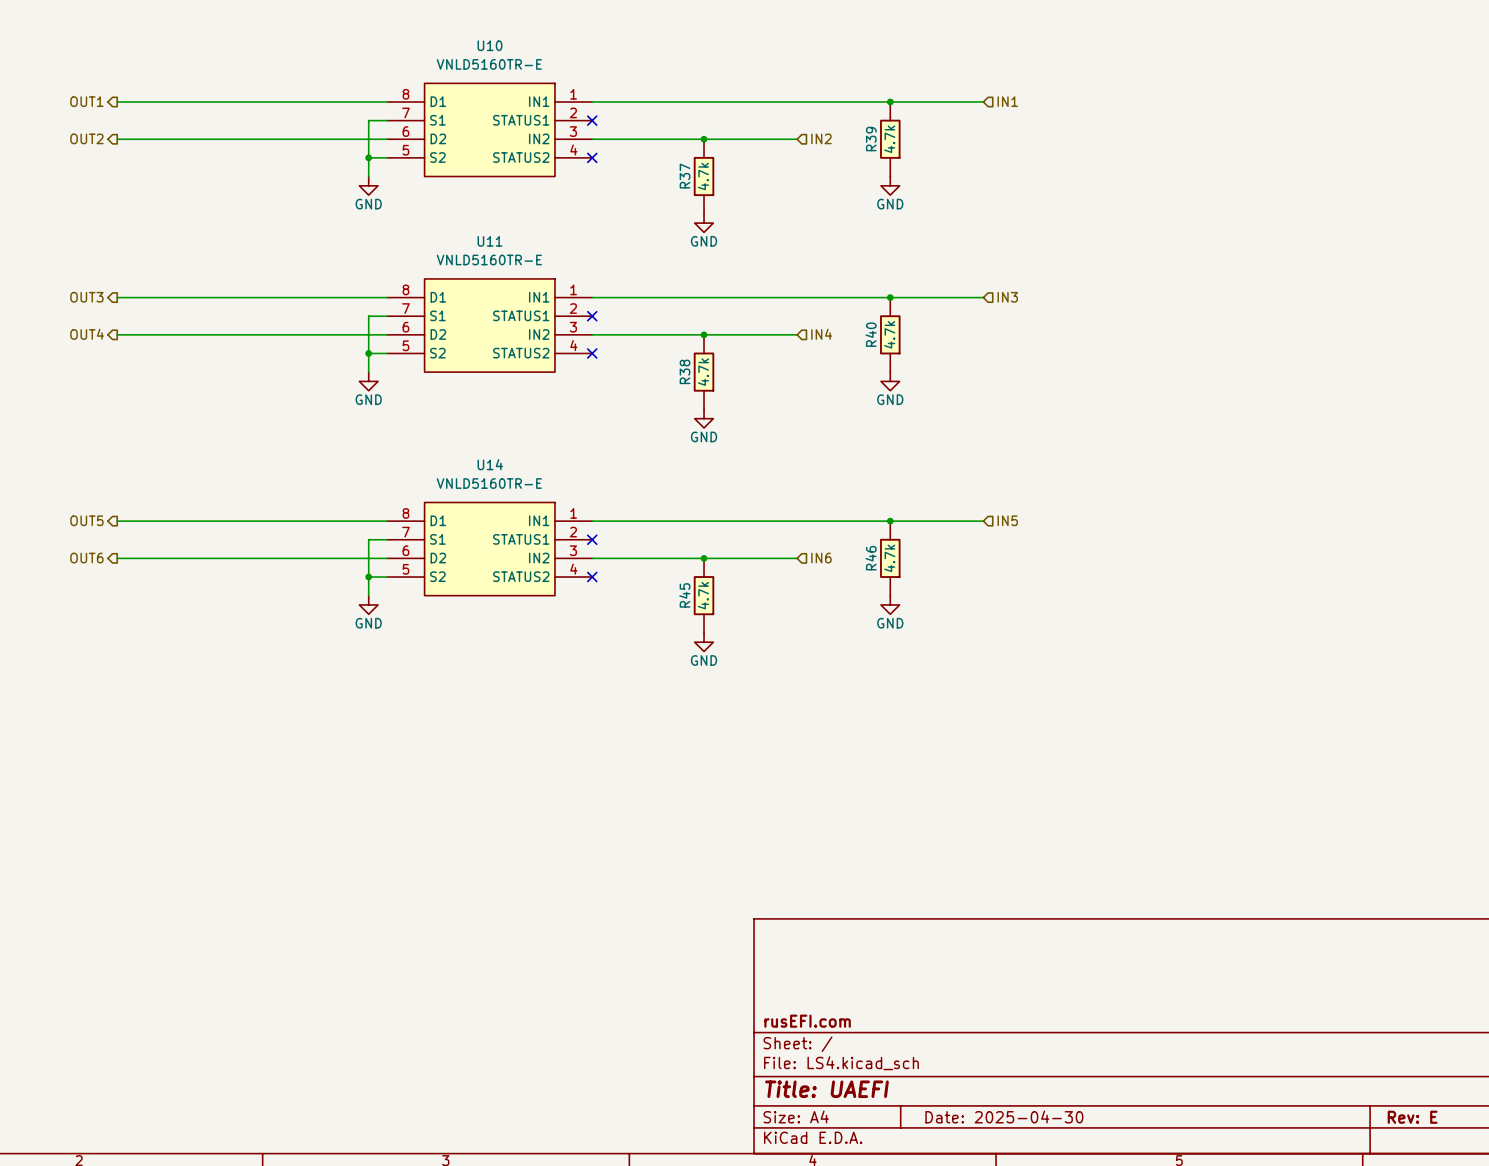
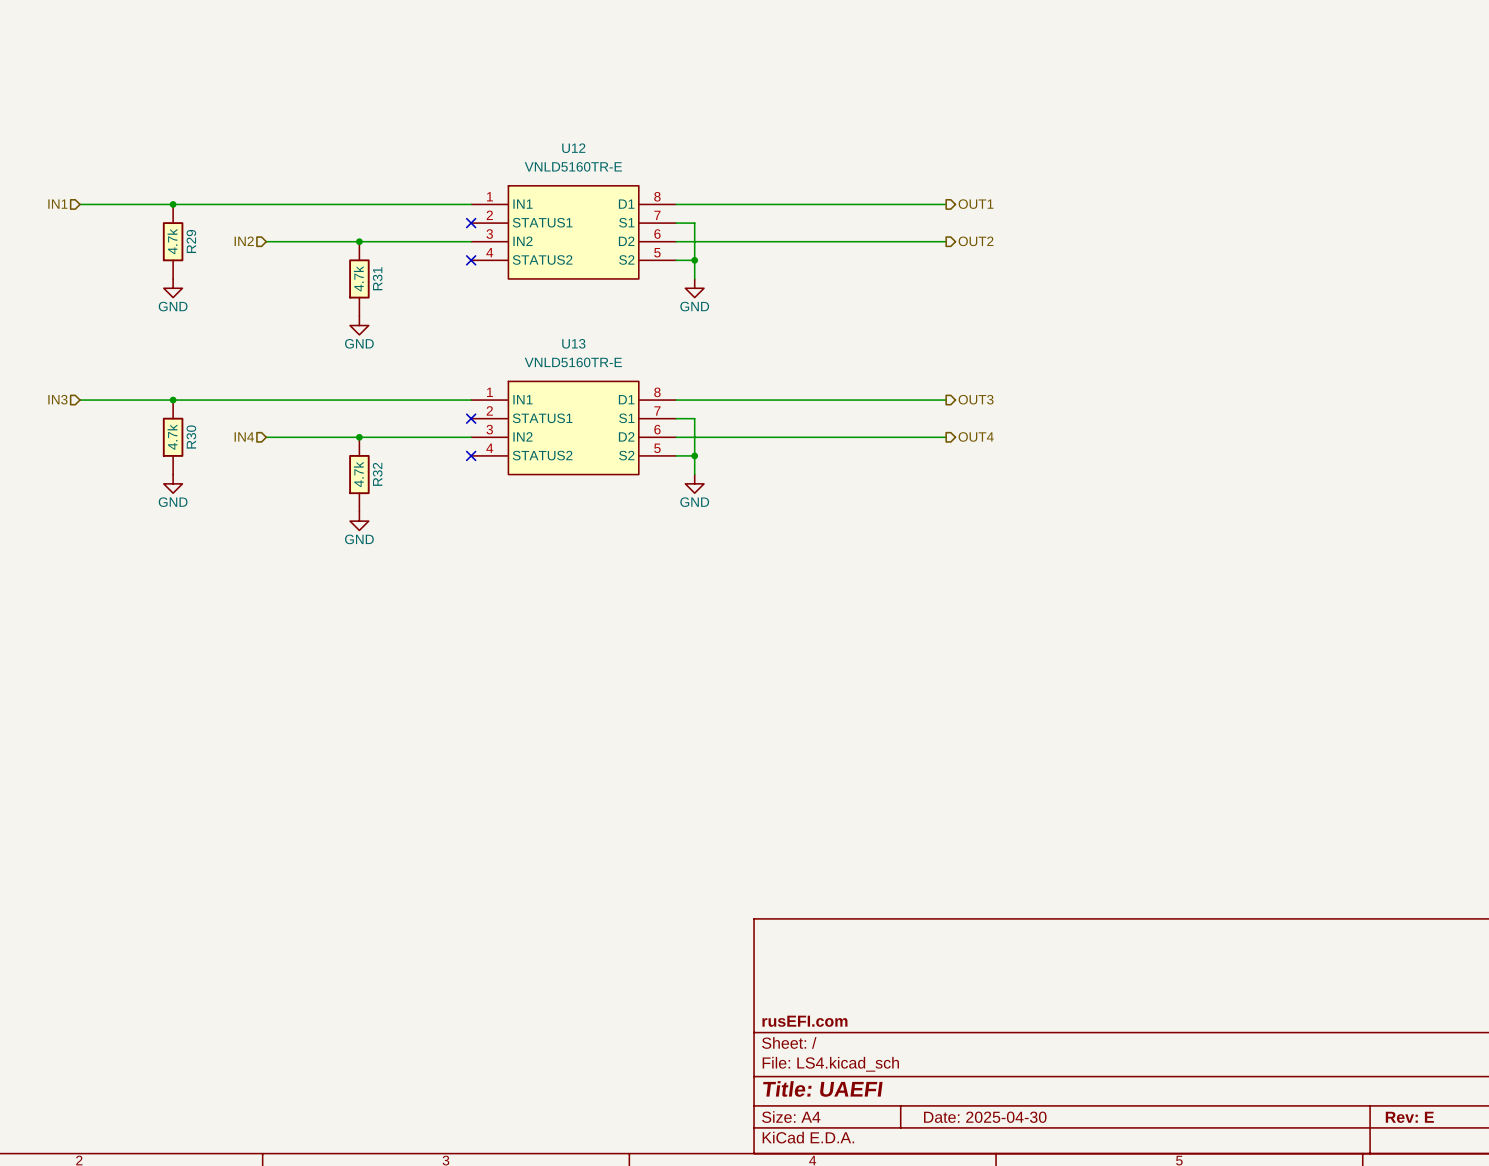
hierarchical label: OUT1 (86, 101) -> none
hierarchical label: IN1 (1007, 101) -> none
wire: (117, 102) (387, 102) -> none
wire: (592, 102) (983, 102) -> none
junction: (890, 102) -> none
wire: (387, 120) (368, 120) (368, 176) -> none
no-connect mark: (592, 120) -> none
U10: VNLD5160TR-E (489, 129) -> none
hierarchical label: OUT2 (86, 138) -> none
hierarchical label: IN2 (821, 138) -> none
wire: (117, 139) (387, 139) -> none
wire: (592, 139) (797, 139) -> none
junction: (704, 139) -> none
R39: 4.7k (890, 139) -> none
wire: (368, 157) (387, 157) -> none
junction: (368, 157) -> none
no-connect mark: (592, 157) -> none
R37: 4.7k (704, 176) -> none
power symbol: GND (368, 185) -> none
power symbol: GND (890, 185) -> none
hierarchical label: none -> IN1 (57, 204)
wire: none -> (79, 204) (471, 204)
junction: none -> (173, 204)
wire: none -> (676, 204) (946, 204)
hierarchical label: none -> OUT1 (976, 204)
no-connect mark: none -> (471, 223)
wire: none -> (676, 223) (694, 223) (694, 278)
power symbol: GND (704, 223) -> none
U12: none -> VNLD5160TR-E (573, 232)
R29: none -> 4.7k (173, 241)
hierarchical label: none -> IN2 (244, 241)
wire: none -> (266, 241) (471, 241)
junction: none -> (359, 241)
wire: none -> (676, 241) (946, 241)
hierarchical label: none -> OUT2 (976, 241)
no-connect mark: none -> (471, 260)
wire: none -> (676, 260) (694, 260)
junction: none -> (694, 260)
R31: none -> 4.7k (359, 278)
power symbol: none -> GND (173, 288)
power symbol: none -> GND (694, 288)
hierarchical label: OUT3 (86, 297) -> none
wire: (117, 297) (387, 297) -> none
wire: (592, 297) (983, 297) -> none
junction: (890, 297) -> none
hierarchical label: IN3 (1007, 297) -> none
wire: (387, 316) (368, 316) (368, 372) -> none
no-connect mark: (592, 316) -> none
U11: VNLD5160TR-E (489, 325) -> none
hierarchical label: OUT4 (87, 334) -> none
wire: (117, 334) (387, 334) -> none
wire: (592, 334) (797, 334) -> none
junction: (704, 334) -> none
hierarchical label: IN4 (821, 334) -> none
R40: 4.7k (890, 334) -> none
wire: (368, 353) (387, 353) -> none
junction: (368, 353) -> none
no-connect mark: (592, 353) -> none
R38: 4.7k (704, 372) -> none
power symbol position: GND (368, 381) -> GND (359, 325)
power symbol: GND (890, 381) -> none
hierarchical label: none -> IN3 (57, 399)
hierarchical label: none -> OUT3 (976, 399)
wire: none -> (79, 400) (471, 400)
junction: none -> (173, 400)
wire: none -> (676, 400) (946, 400)
no-connect mark: none -> (471, 418)
wire: none -> (676, 418) (694, 418) (694, 474)
power symbol: GND (704, 418) -> none
U13: none -> VNLD5160TR-E (573, 427)
hierarchical label: none -> IN4 (244, 436)
hierarchical label: none -> OUT4 (976, 436)
R30: none -> 4.7k (173, 437)
wire: none -> (266, 437) (471, 437)
junction: none -> (359, 437)
wire: none -> (676, 437) (946, 437)
no-connect mark: none -> (471, 455)
wire: none -> (676, 455) (694, 455)
junction: none -> (694, 455)
R32: none -> 4.7k (359, 474)
power symbol: none -> GND (173, 483)
power symbol: none -> GND (694, 483)
hierarchical label: OUT5 (86, 520) -> none
hierarchical label: IN5 (1007, 520) -> none
wire: (117, 521) (387, 521) -> none
power symbol: none -> GND (359, 521)
wire: (592, 521) (983, 521) -> none
junction: (890, 521) -> none
wire: (387, 539) (368, 539) (368, 595) -> none
no-connect mark: (592, 539) -> none
U14: VNLD5160TR-E (489, 549) -> none
hierarchical label: OUT6 (86, 558) -> none
wire: (117, 558) (387, 558) -> none
wire: (592, 558) (797, 558) -> none
junction: (704, 558) -> none
hierarchical label: IN6 (821, 558) -> none
R46: 4.7k (890, 558) -> none
wire: (368, 577) (387, 577) -> none
junction: (368, 577) -> none
no-connect mark: (592, 577) -> none
R45: 4.7k (704, 595) -> none
power symbol: GND (368, 604) -> none
power symbol: GND (890, 604) -> none
power symbol: GND (704, 642) -> none

